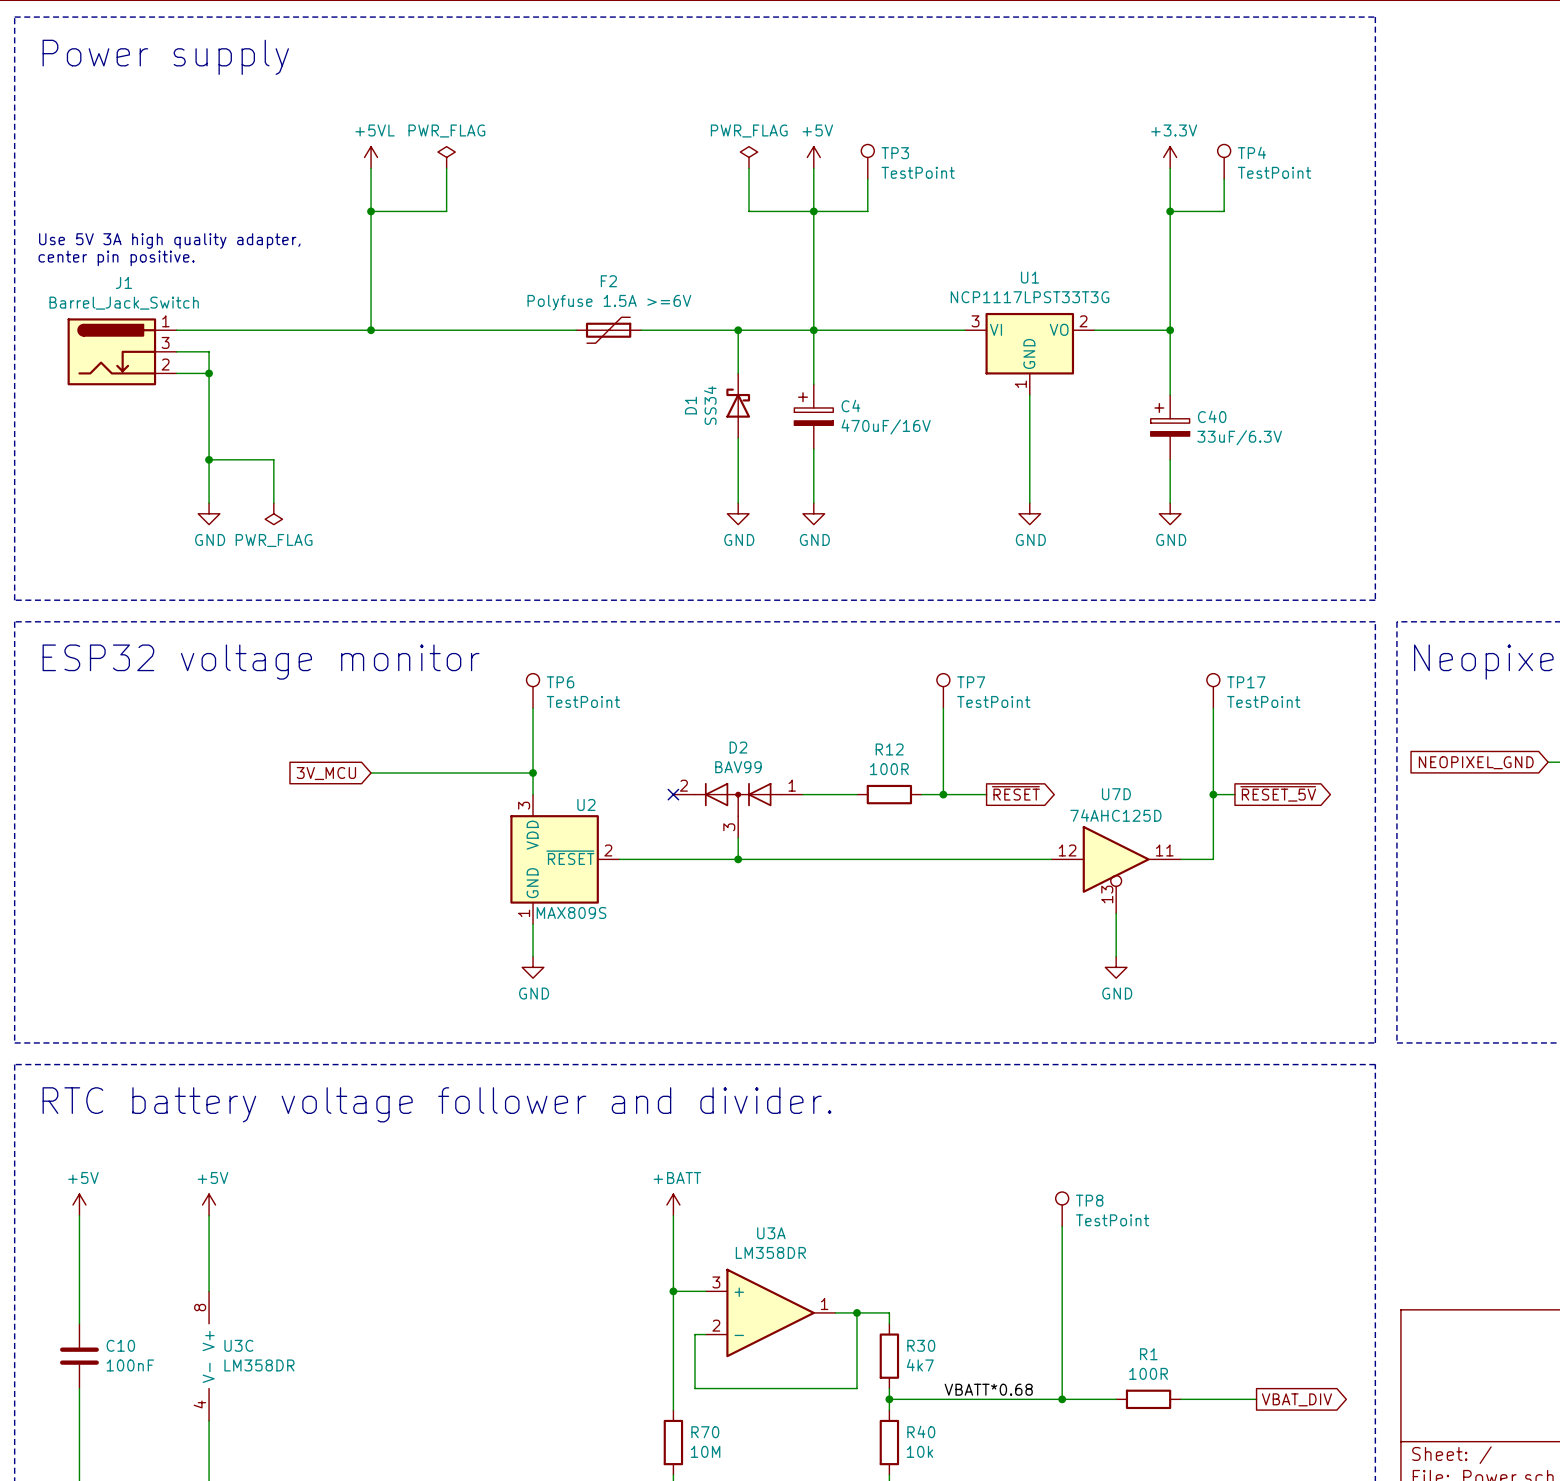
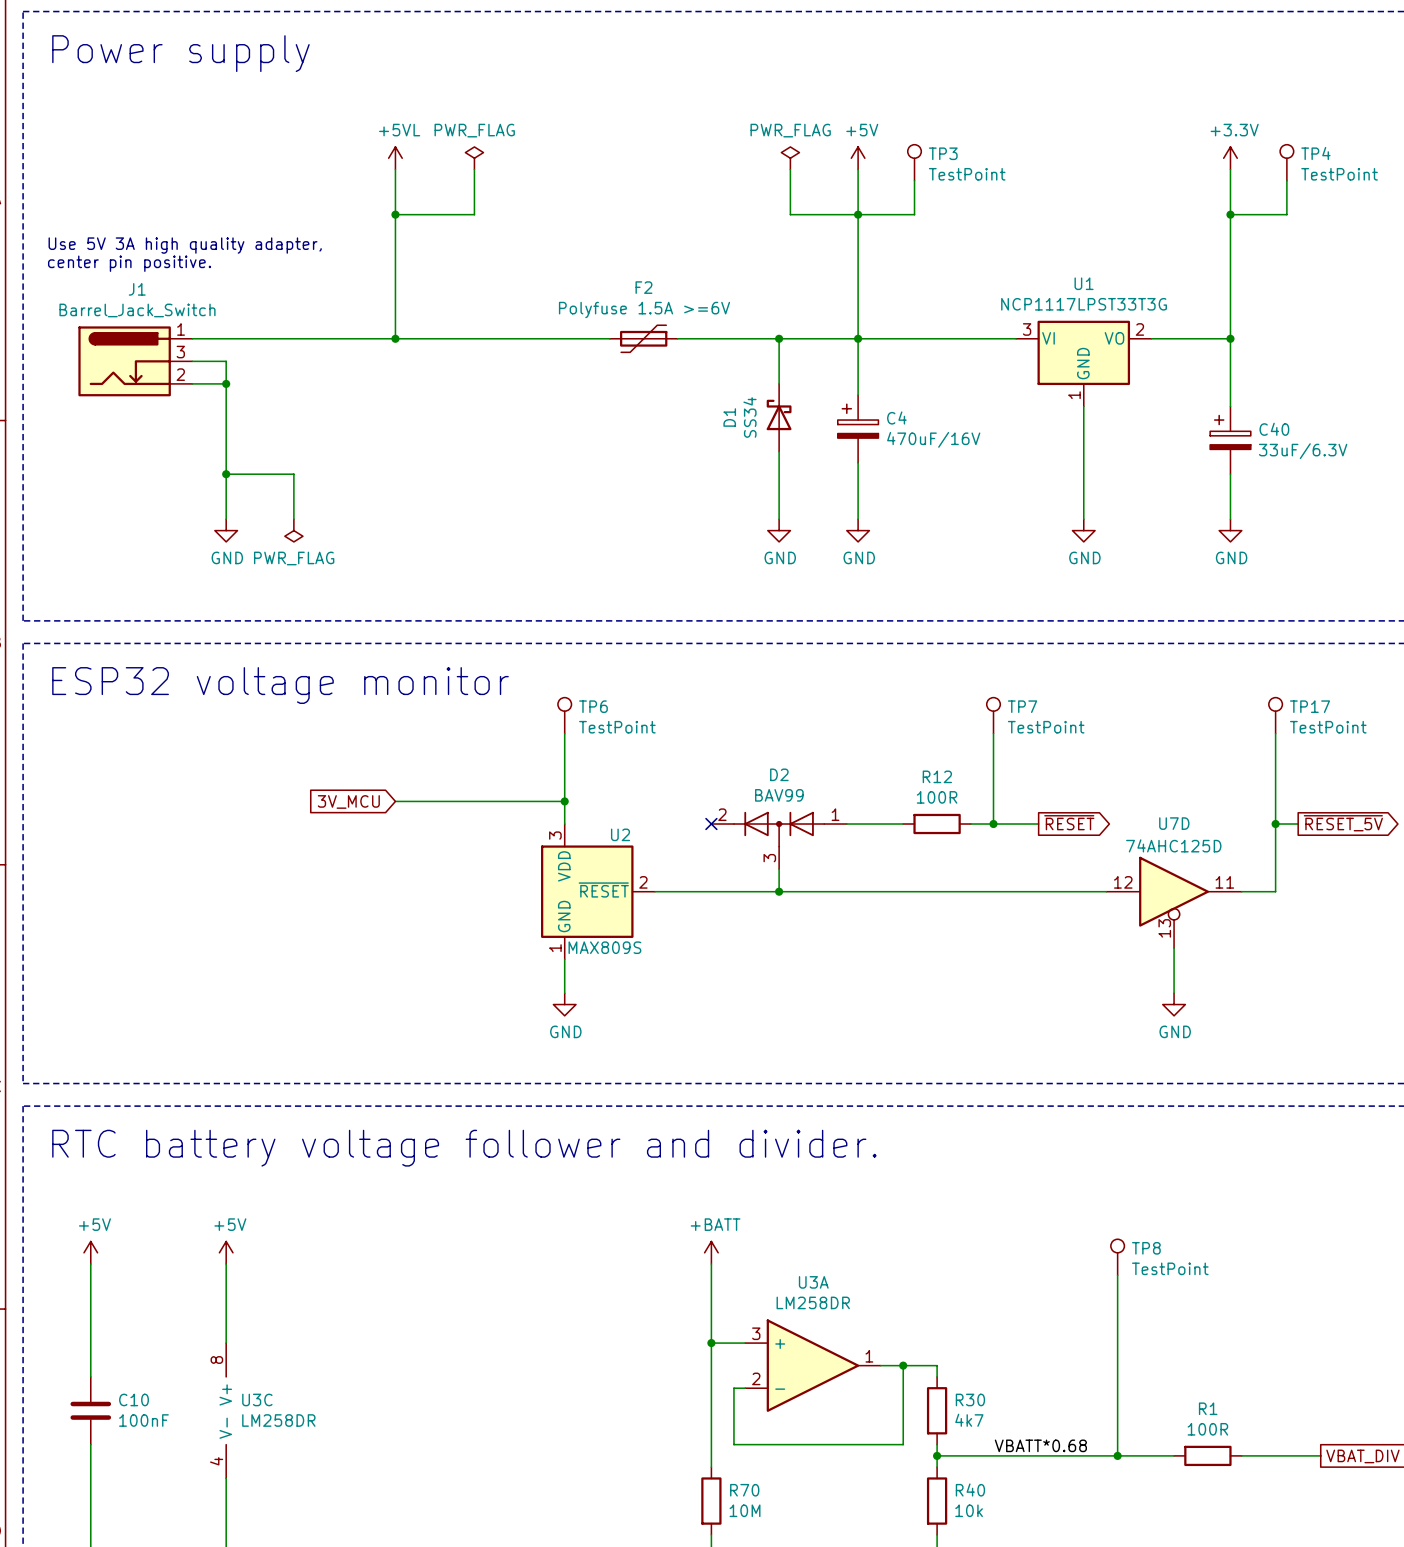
U3A value: LM358DR (770, 1252) -> LM258DR (813, 1302)
U3C value: LM358DR (259, 1365) -> LM258DR (278, 1420)

